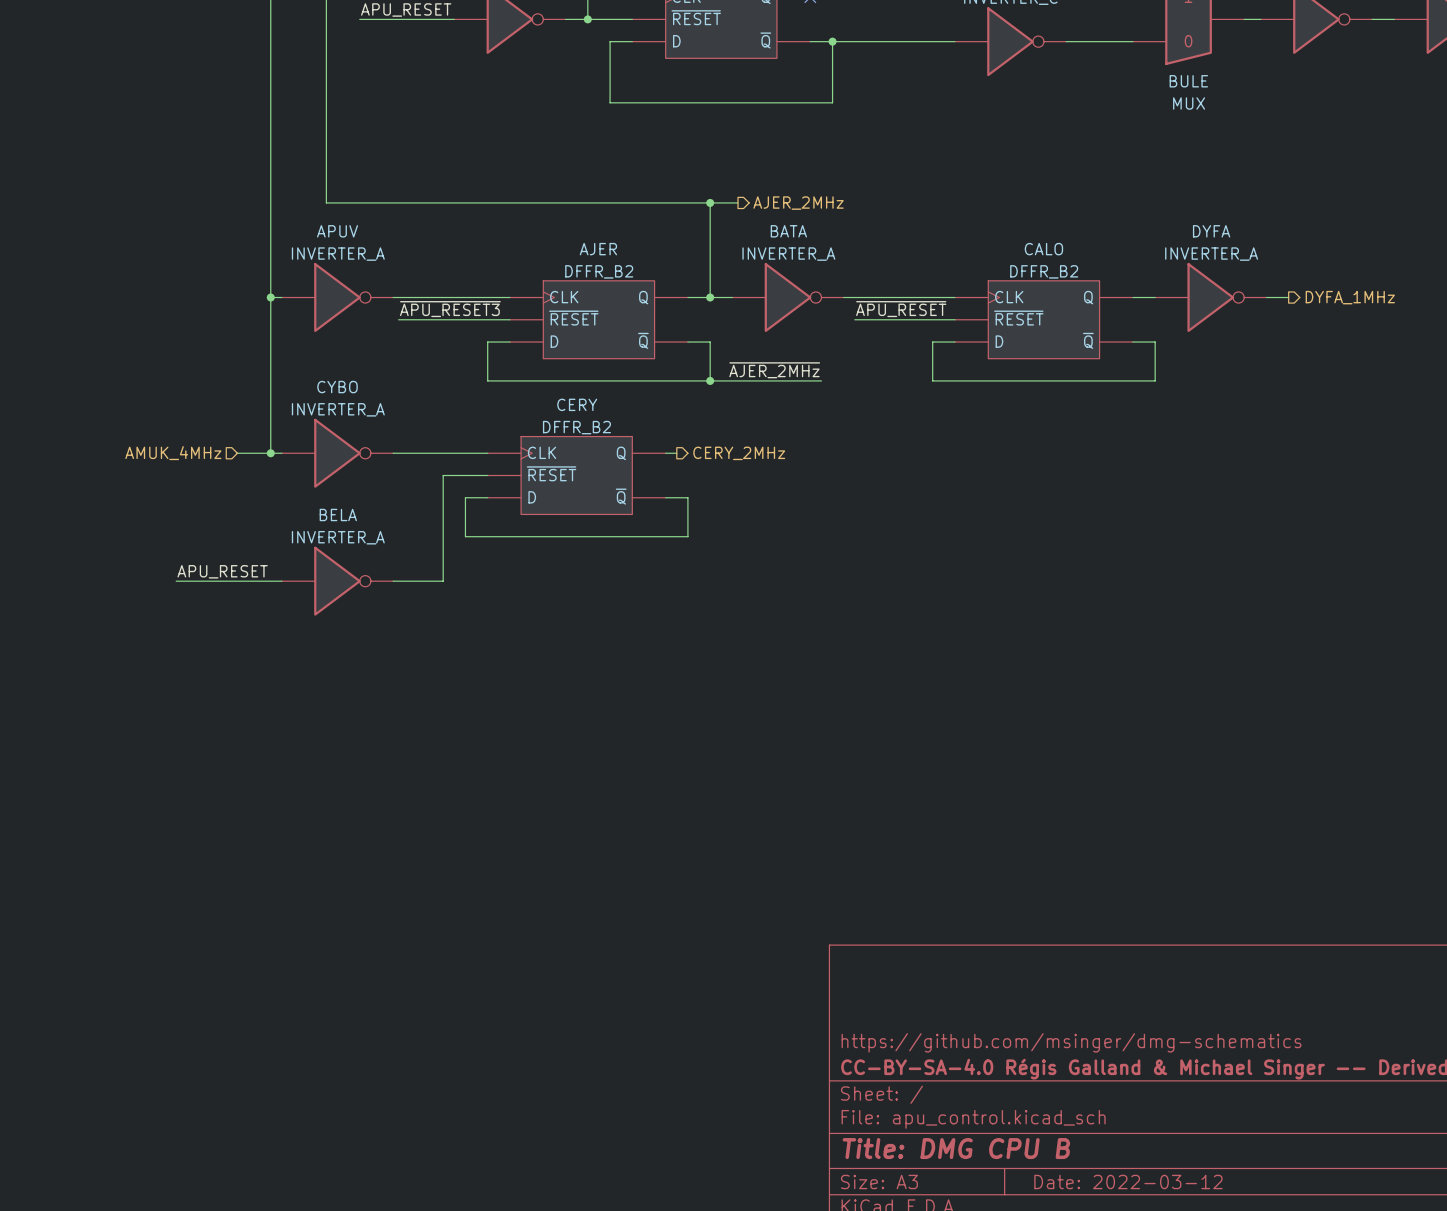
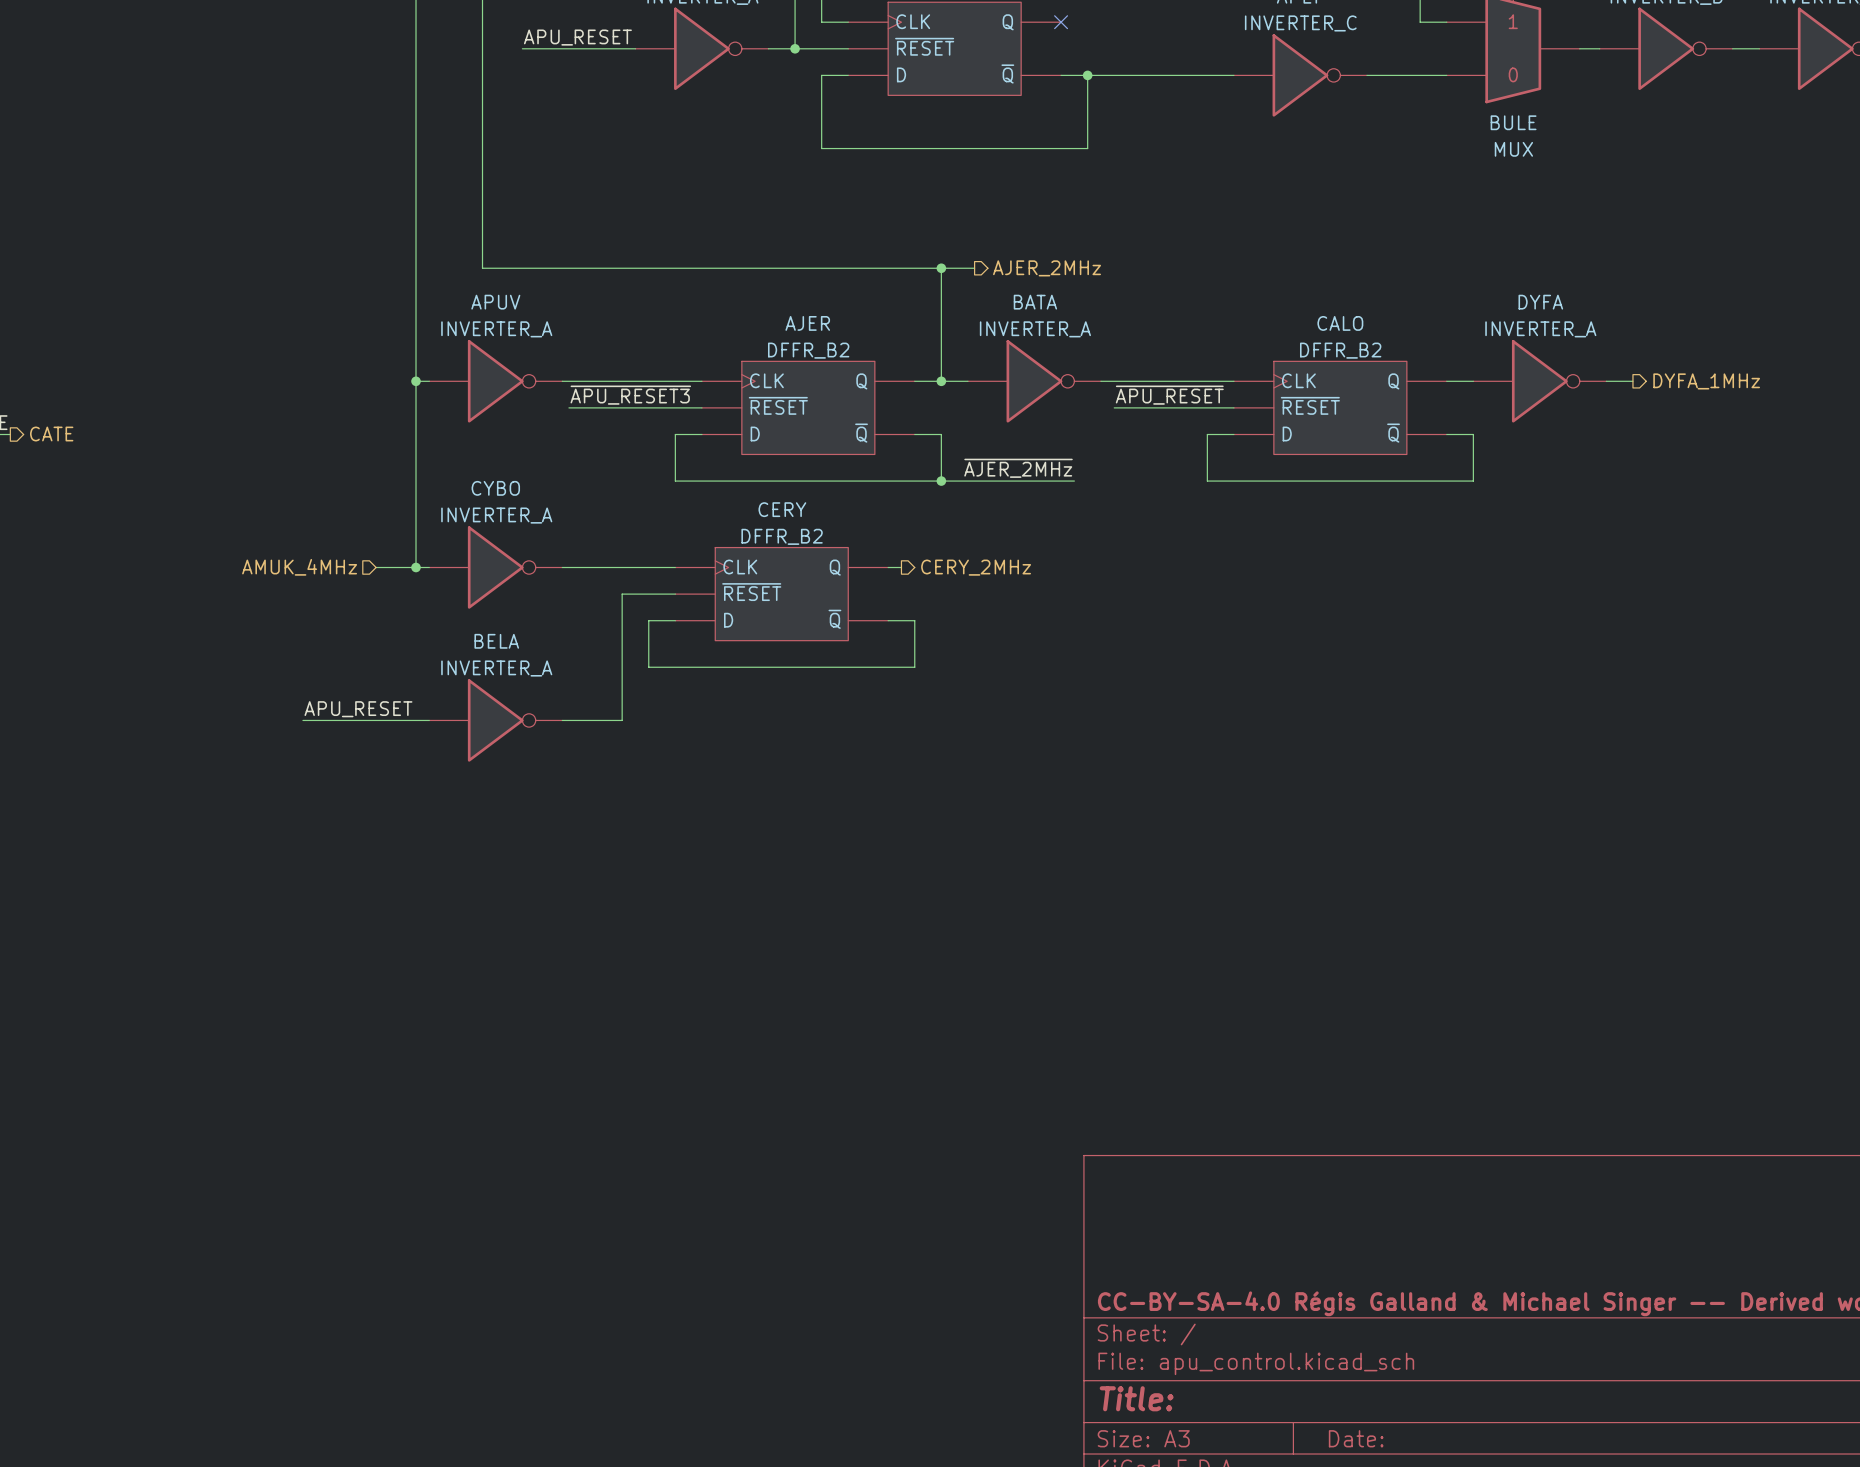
title block: https://github.com/msinger/dmg-schematics (1071, 1042) -> none
title block: Title: DMG CPU B (956, 1148) -> Title: (1136, 1398)
title block: Date: 2022-03-12 (1128, 1181) -> Date: (1356, 1438)

